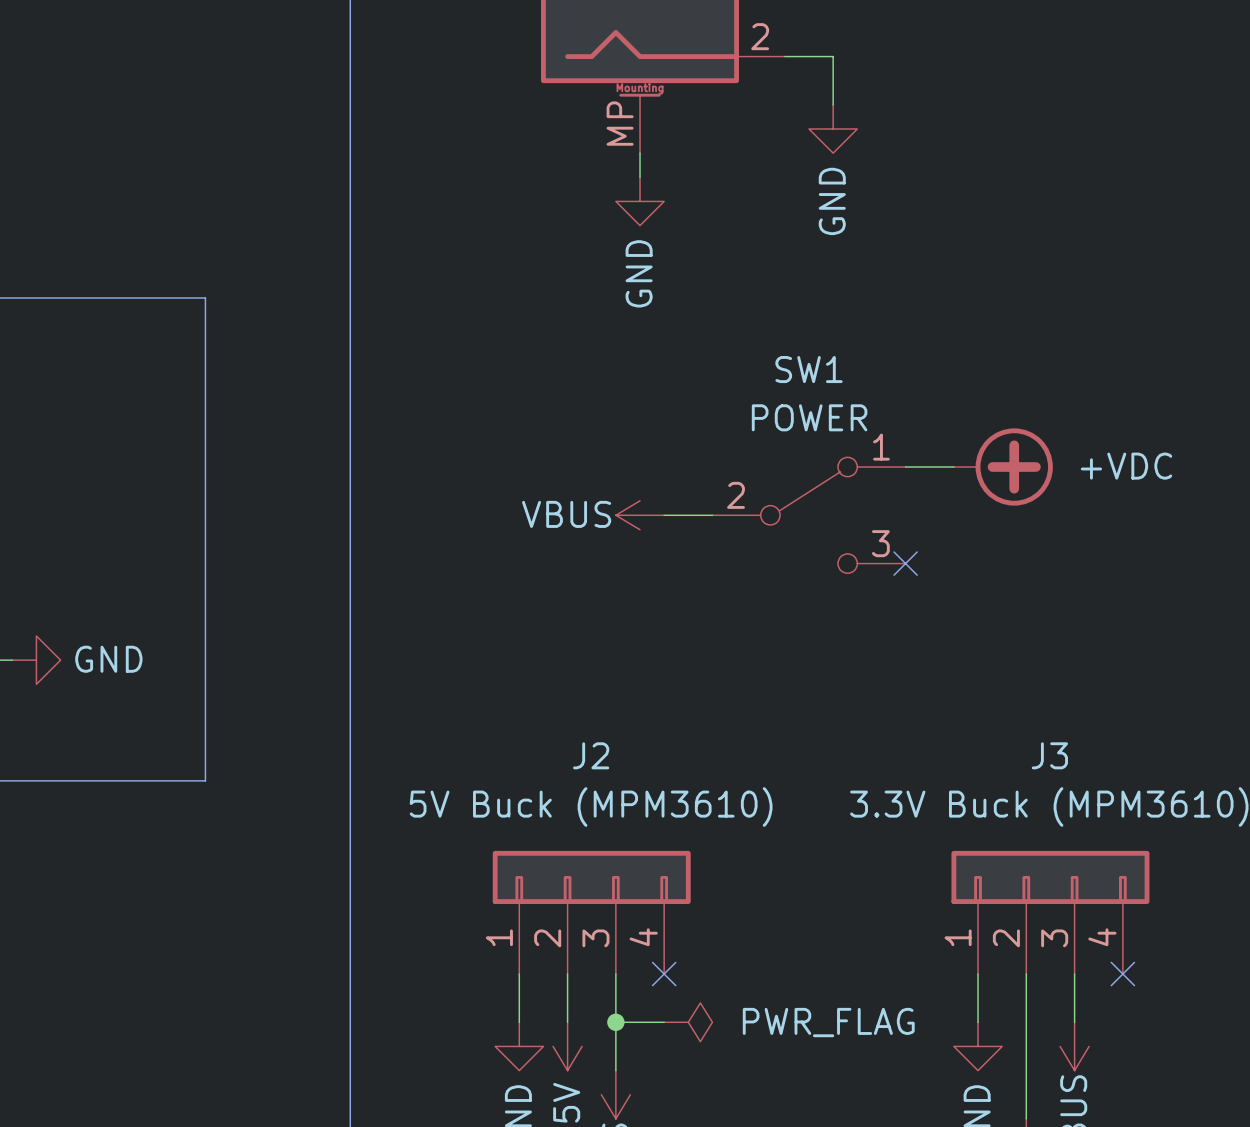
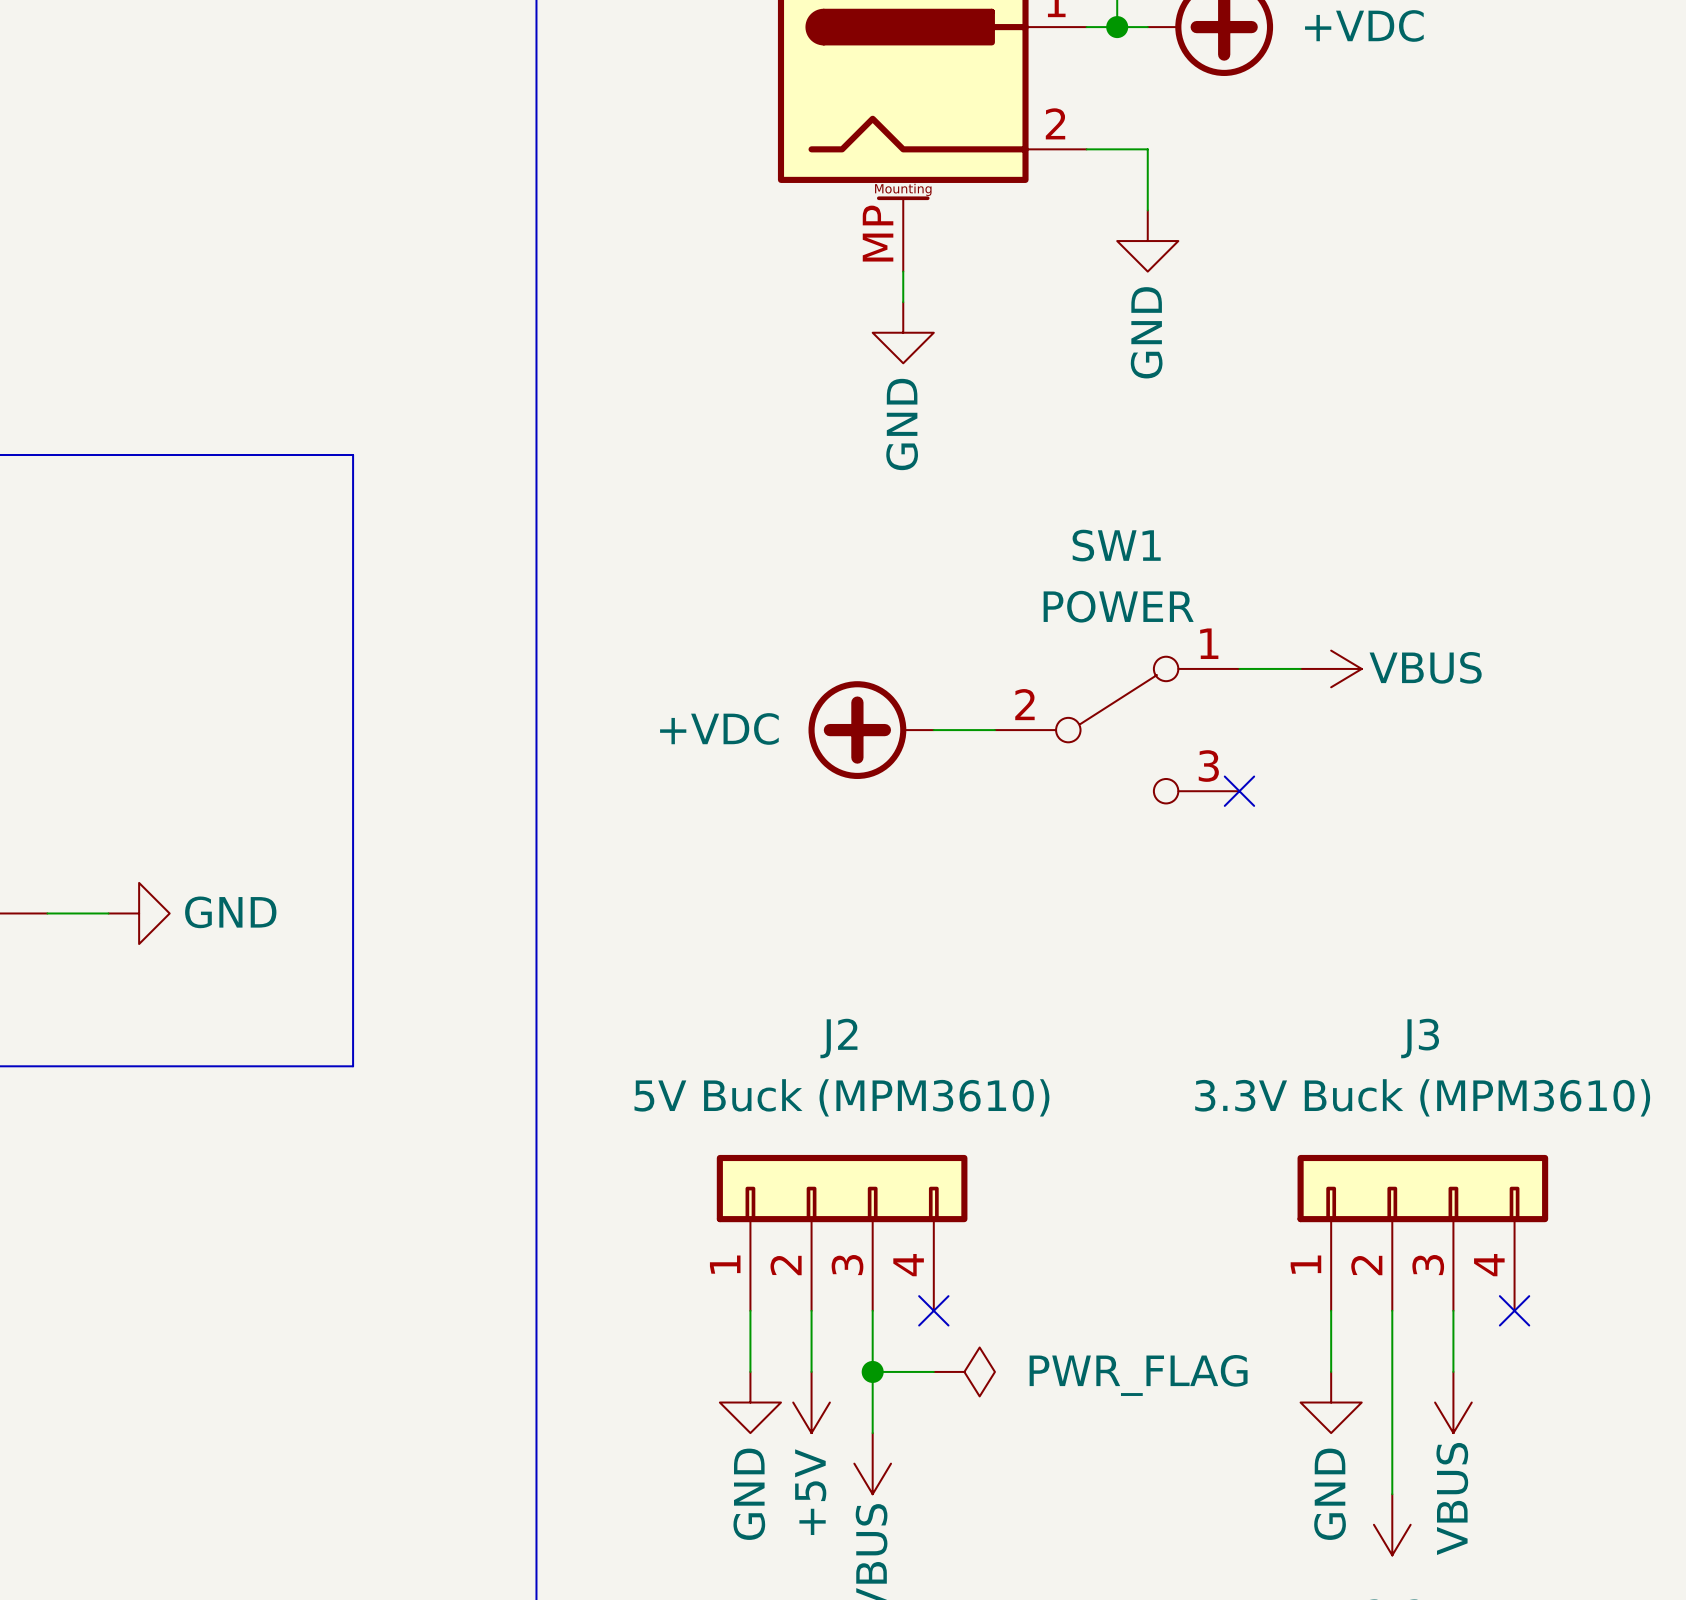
power symbol rotation: 0° (1003, 467) -> 180° (871, 730)
power symbol position: +VDC (1003, 467) -> +VDC (871, 730)
power symbol rotation: 0° (640, 515) -> 180° (1331, 668)
power symbol position: VBUS (640, 515) -> VBUS (1331, 668)

